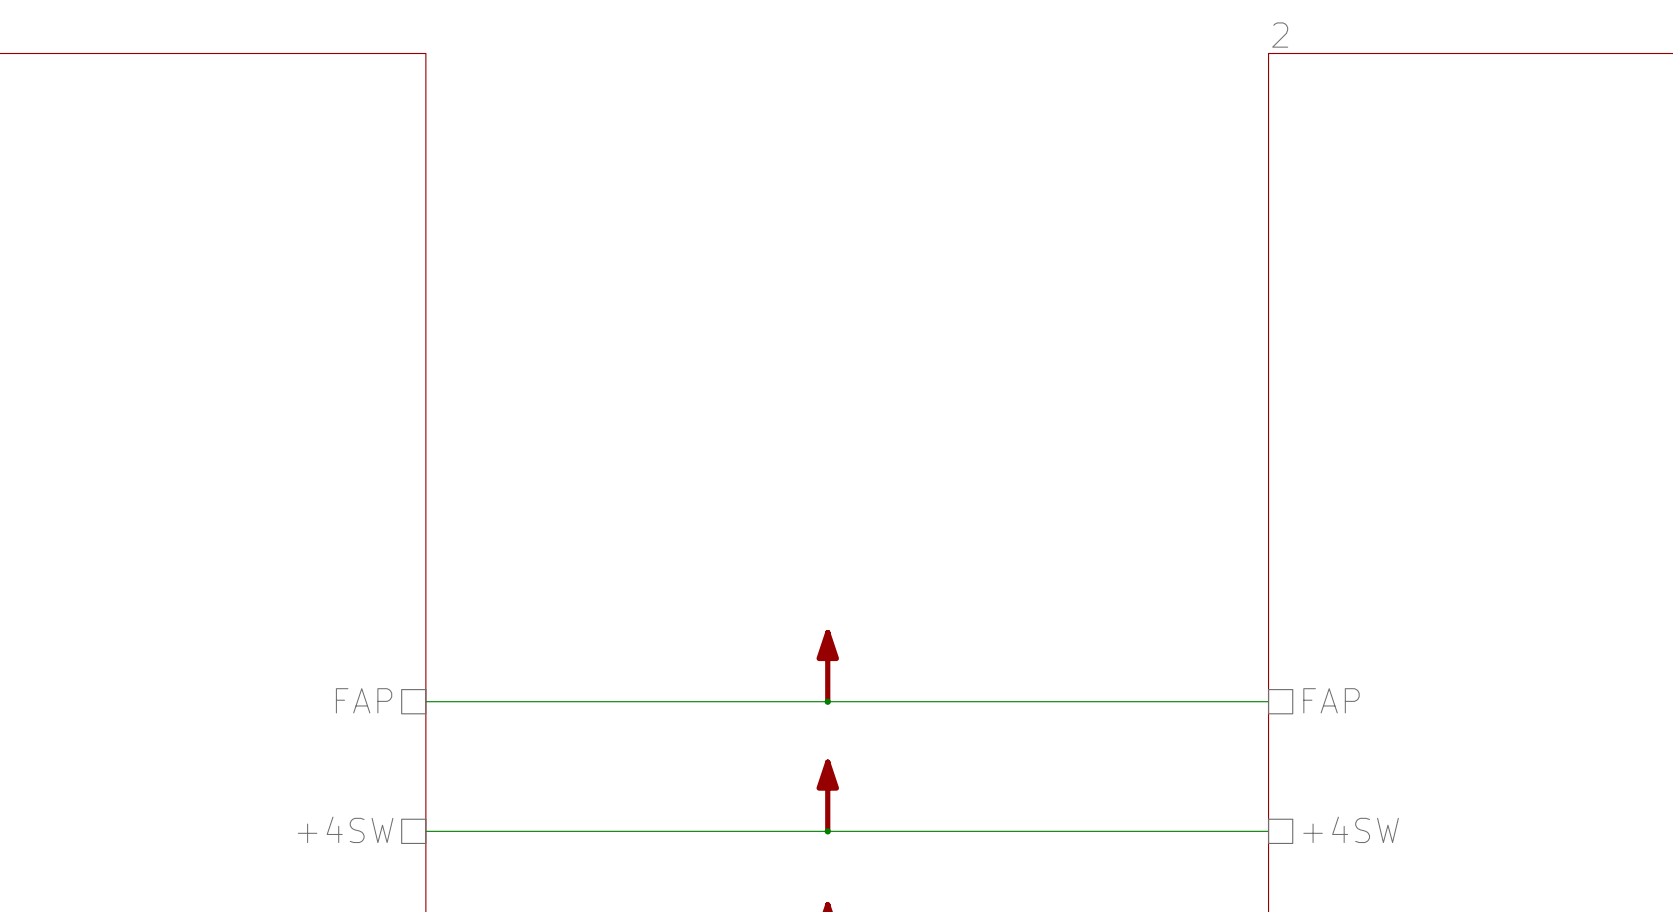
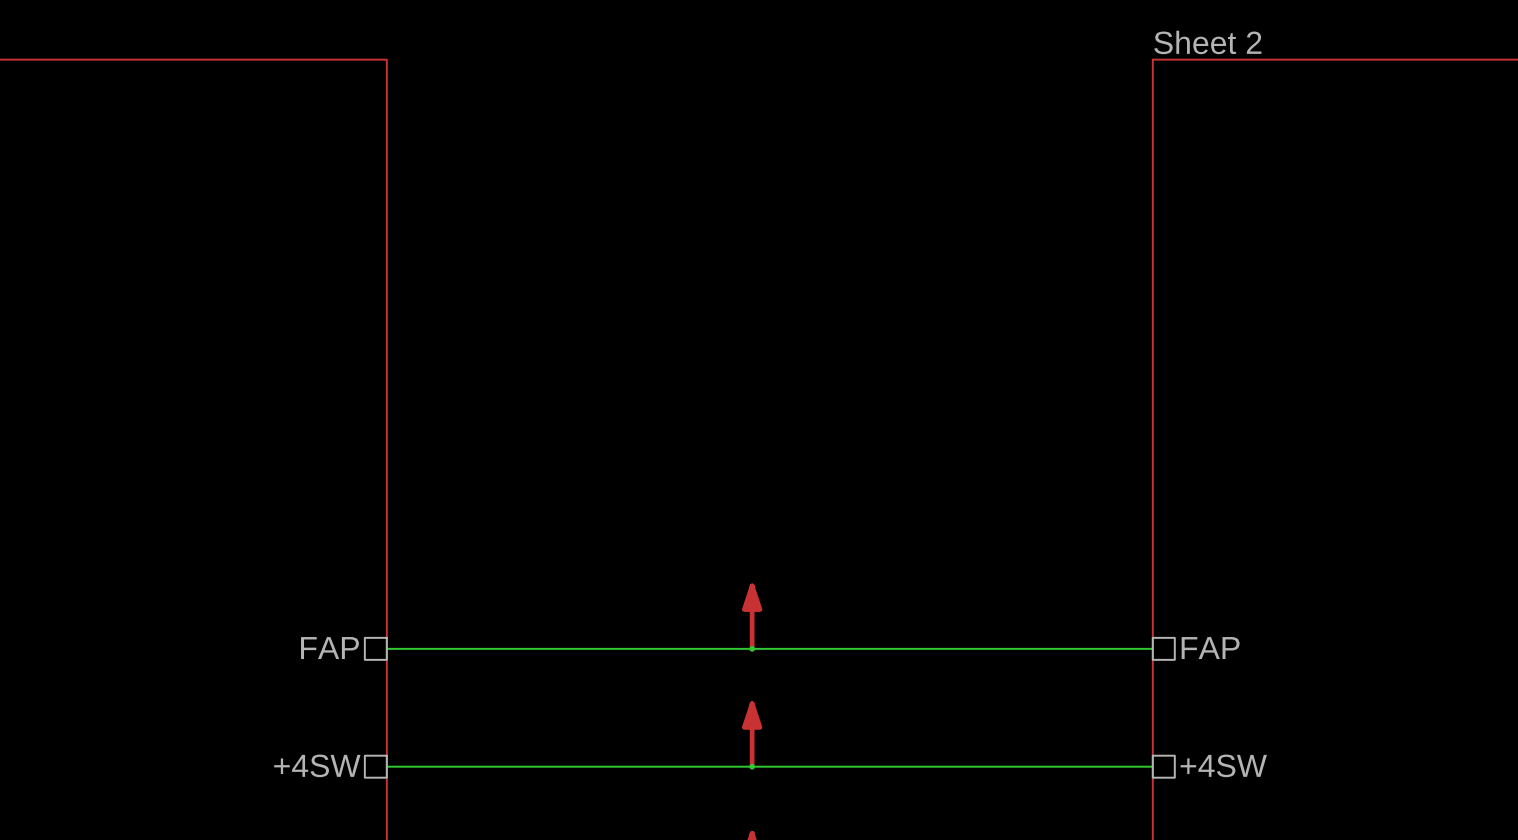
sheet 2 name: 2 (1280, 35) -> Sheet 2 (1207, 42)

